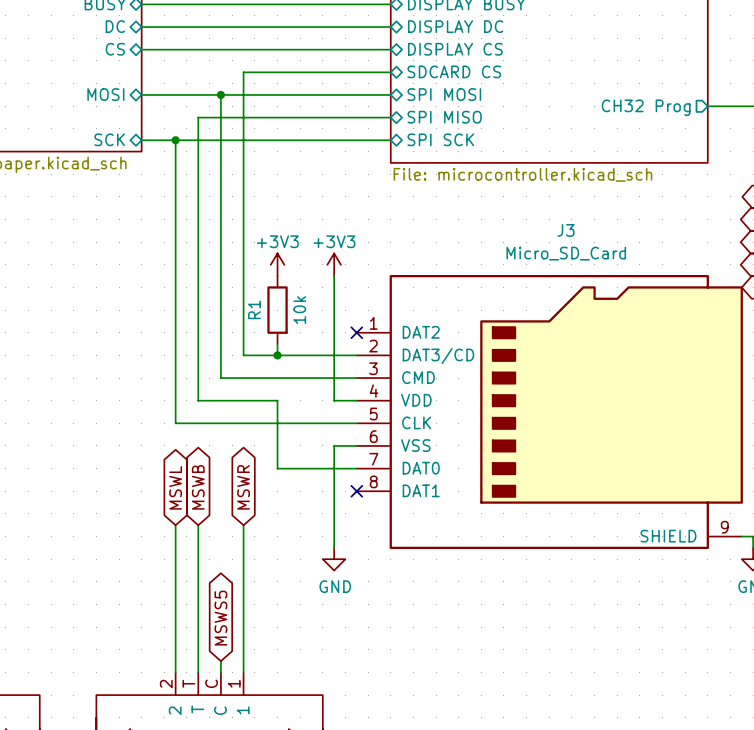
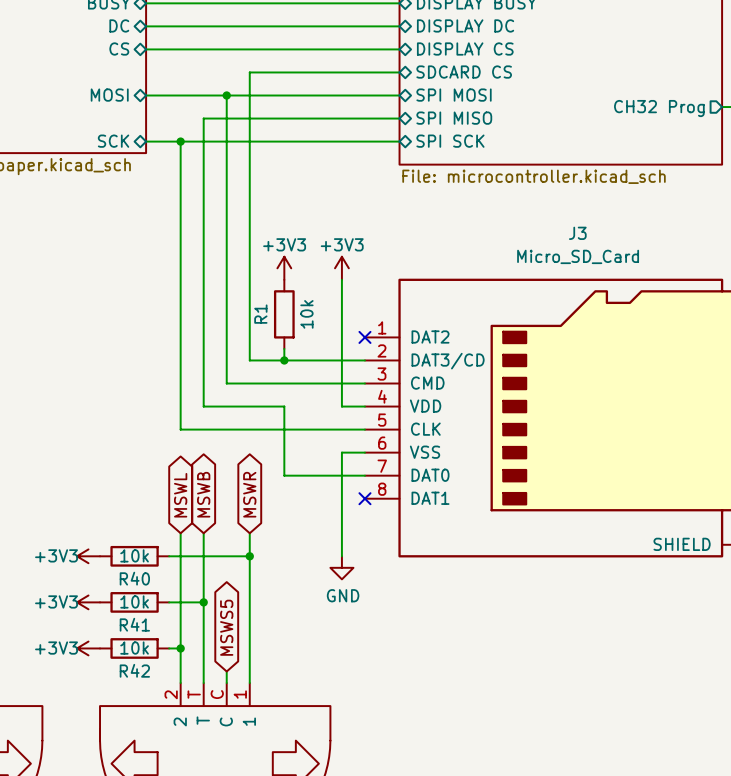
power symbol: none -> +3V3 (88, 556)
R40: none -> 10k (134, 556)
wire: none -> (169, 556) (249, 556)
junction: none -> (249, 556)
power symbol: none -> +3V3 (88, 602)
R41: none -> 10k (134, 602)
wire: none -> (169, 602) (203, 602)
junction: none -> (203, 602)
power symbol: none -> +3V3 (88, 648)
R42: none -> 10k (134, 648)
wire: none -> (169, 648) (180, 648)
junction: none -> (180, 648)

